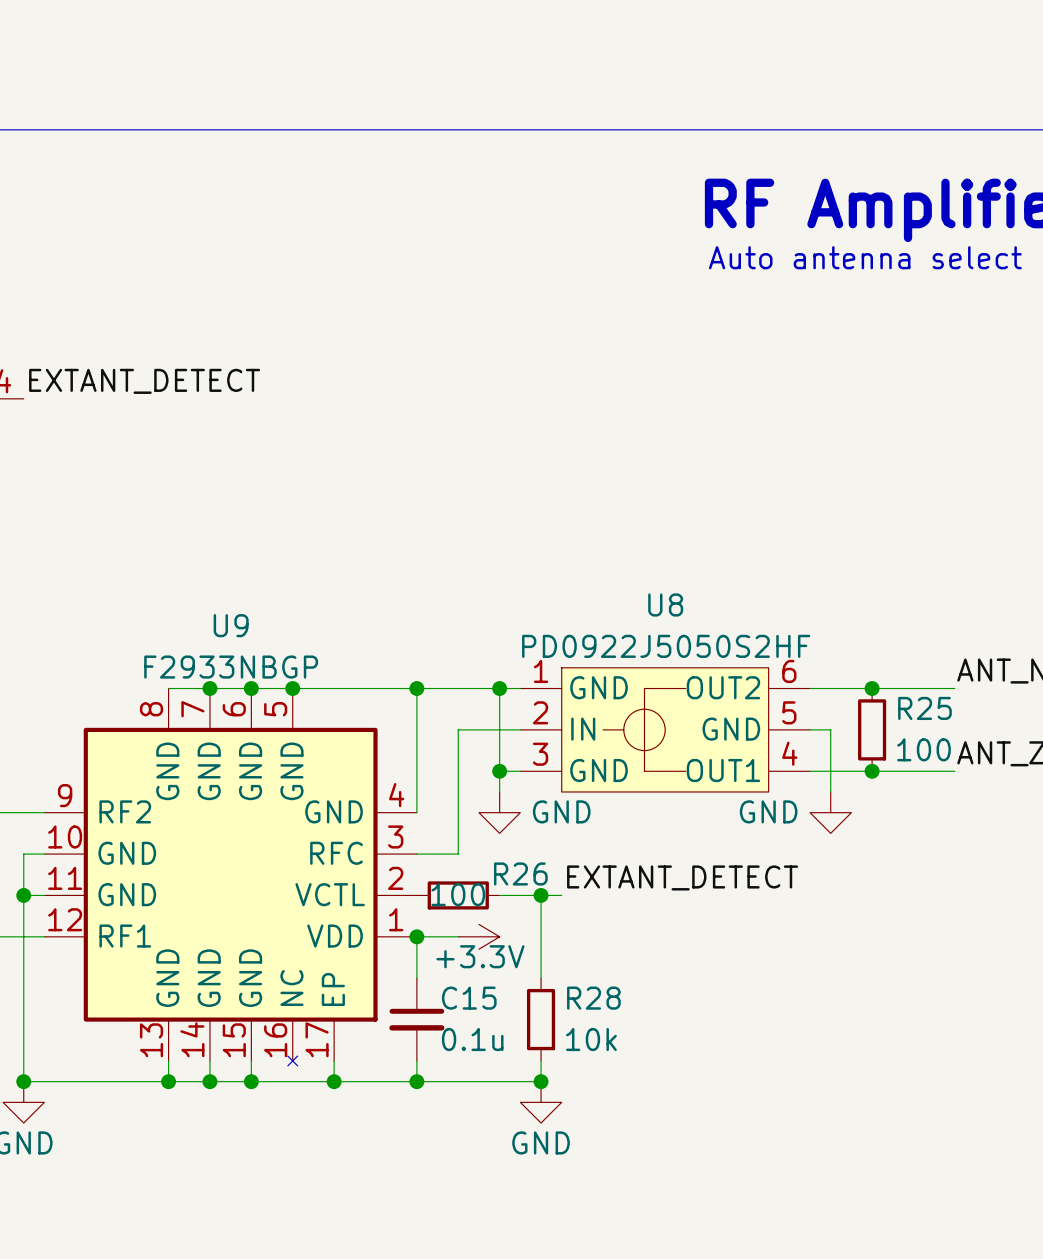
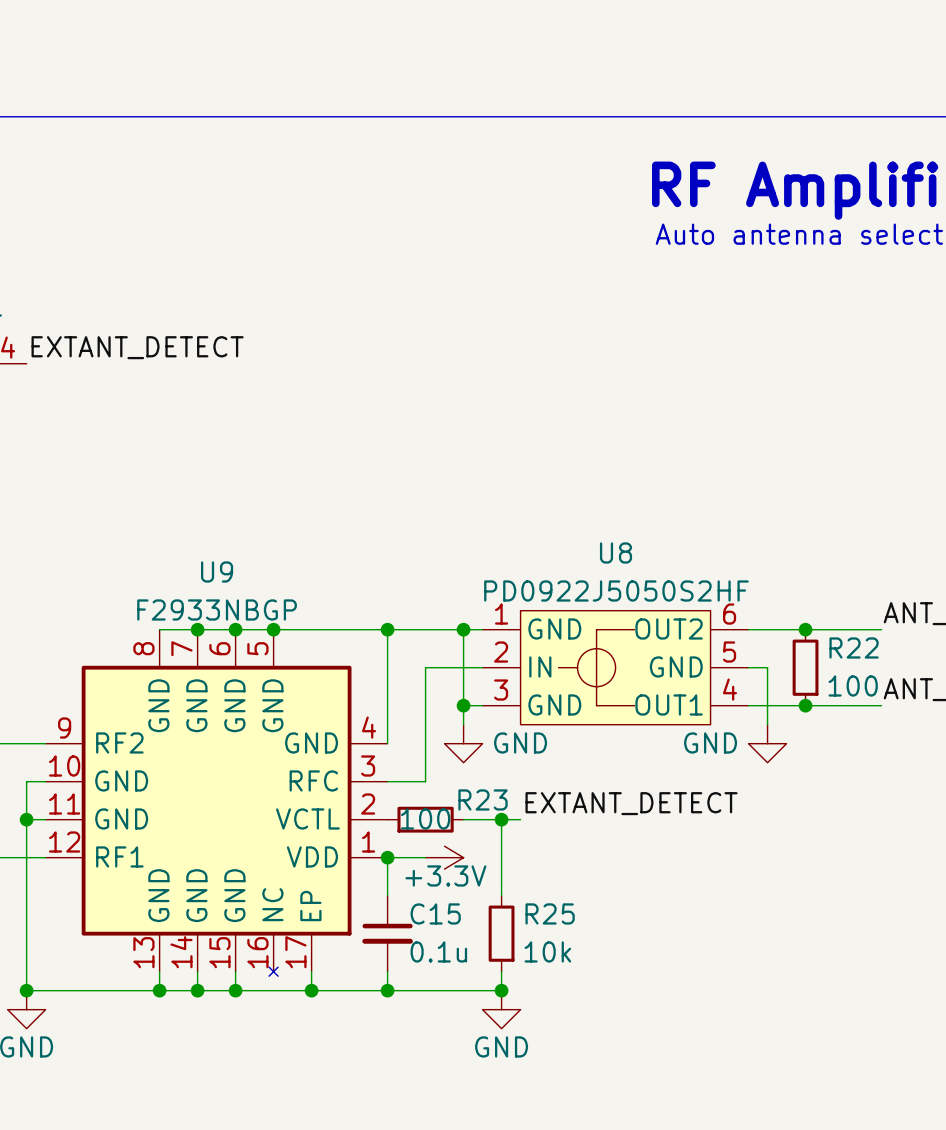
R25 name: R25 (924, 708) -> R22 (854, 647)
R26 name: R26 (520, 873) -> R23 (483, 799)
R28 name: R28 (593, 998) -> R25 (550, 913)

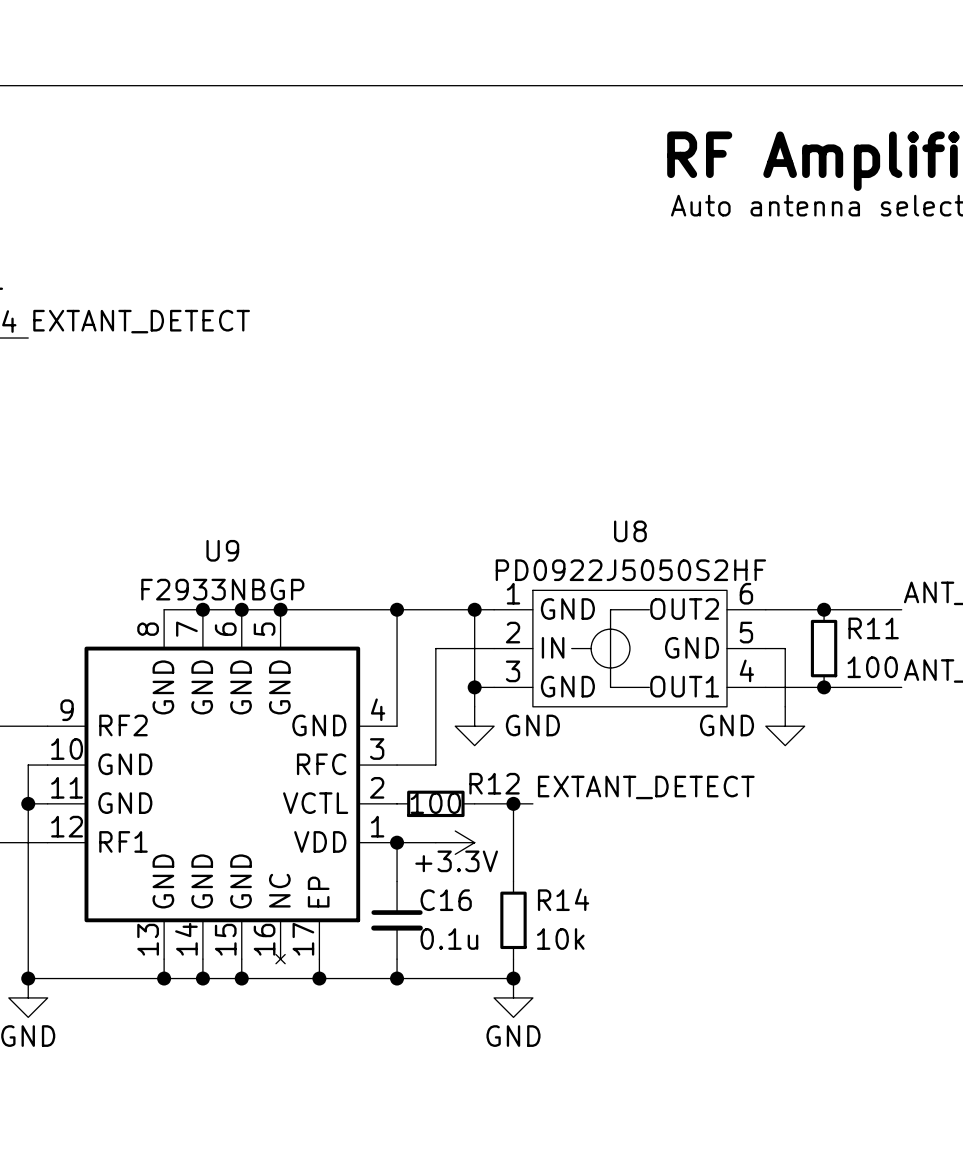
R22 name: R22 (854, 647) -> R11 (873, 628)
R23 name: R23 (483, 799) -> R12 (494, 783)
C15 name: C15 (435, 913) -> C16 (446, 900)
R25 name: R25 (550, 913) -> R14 (563, 899)

